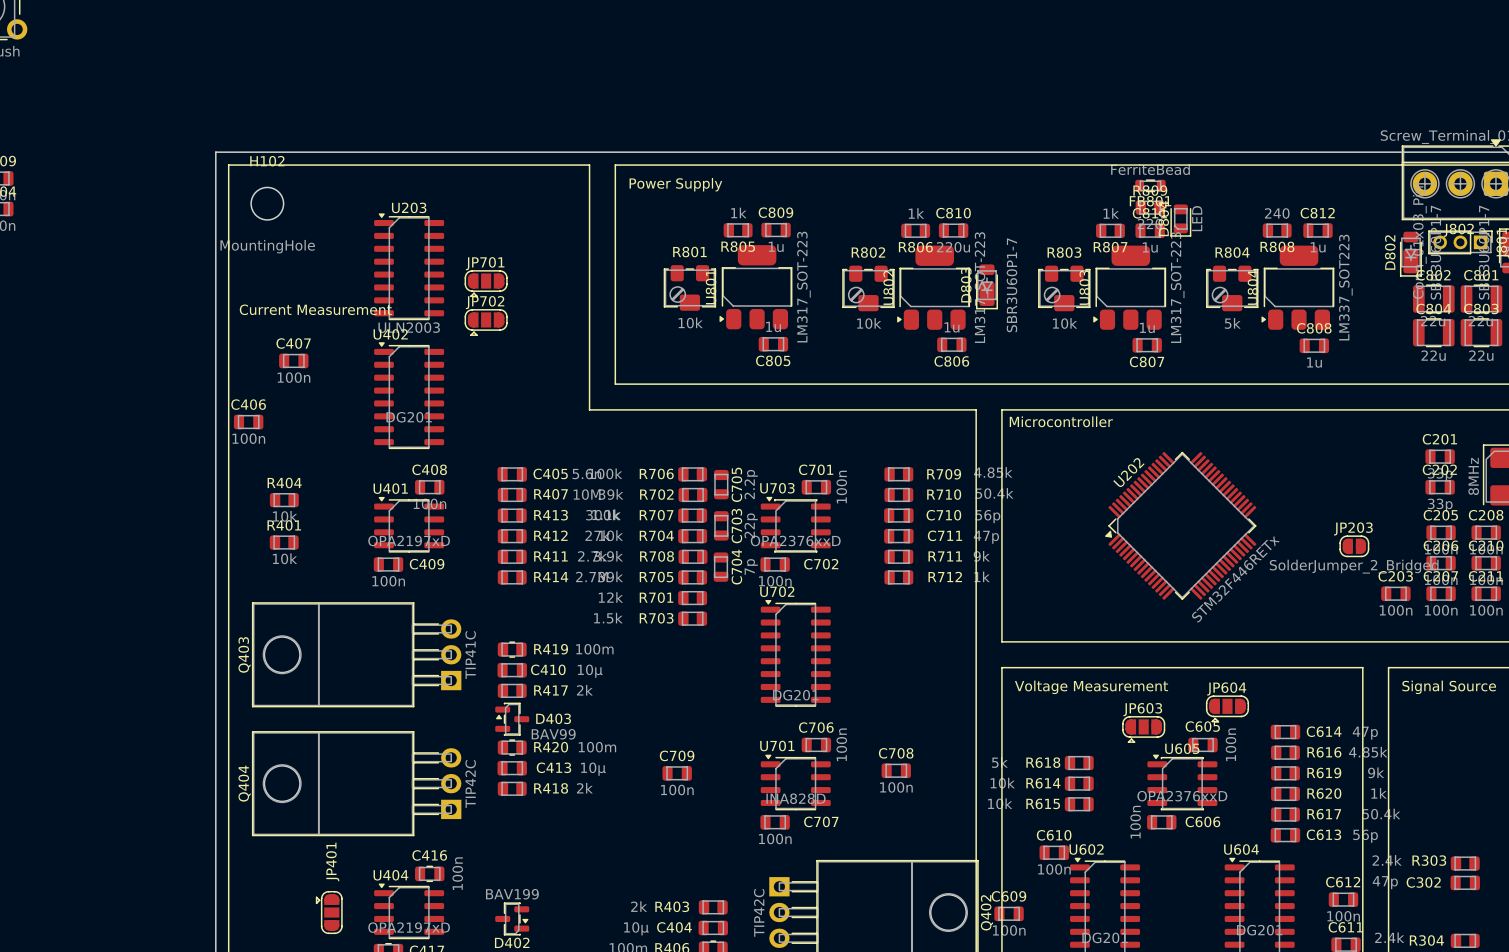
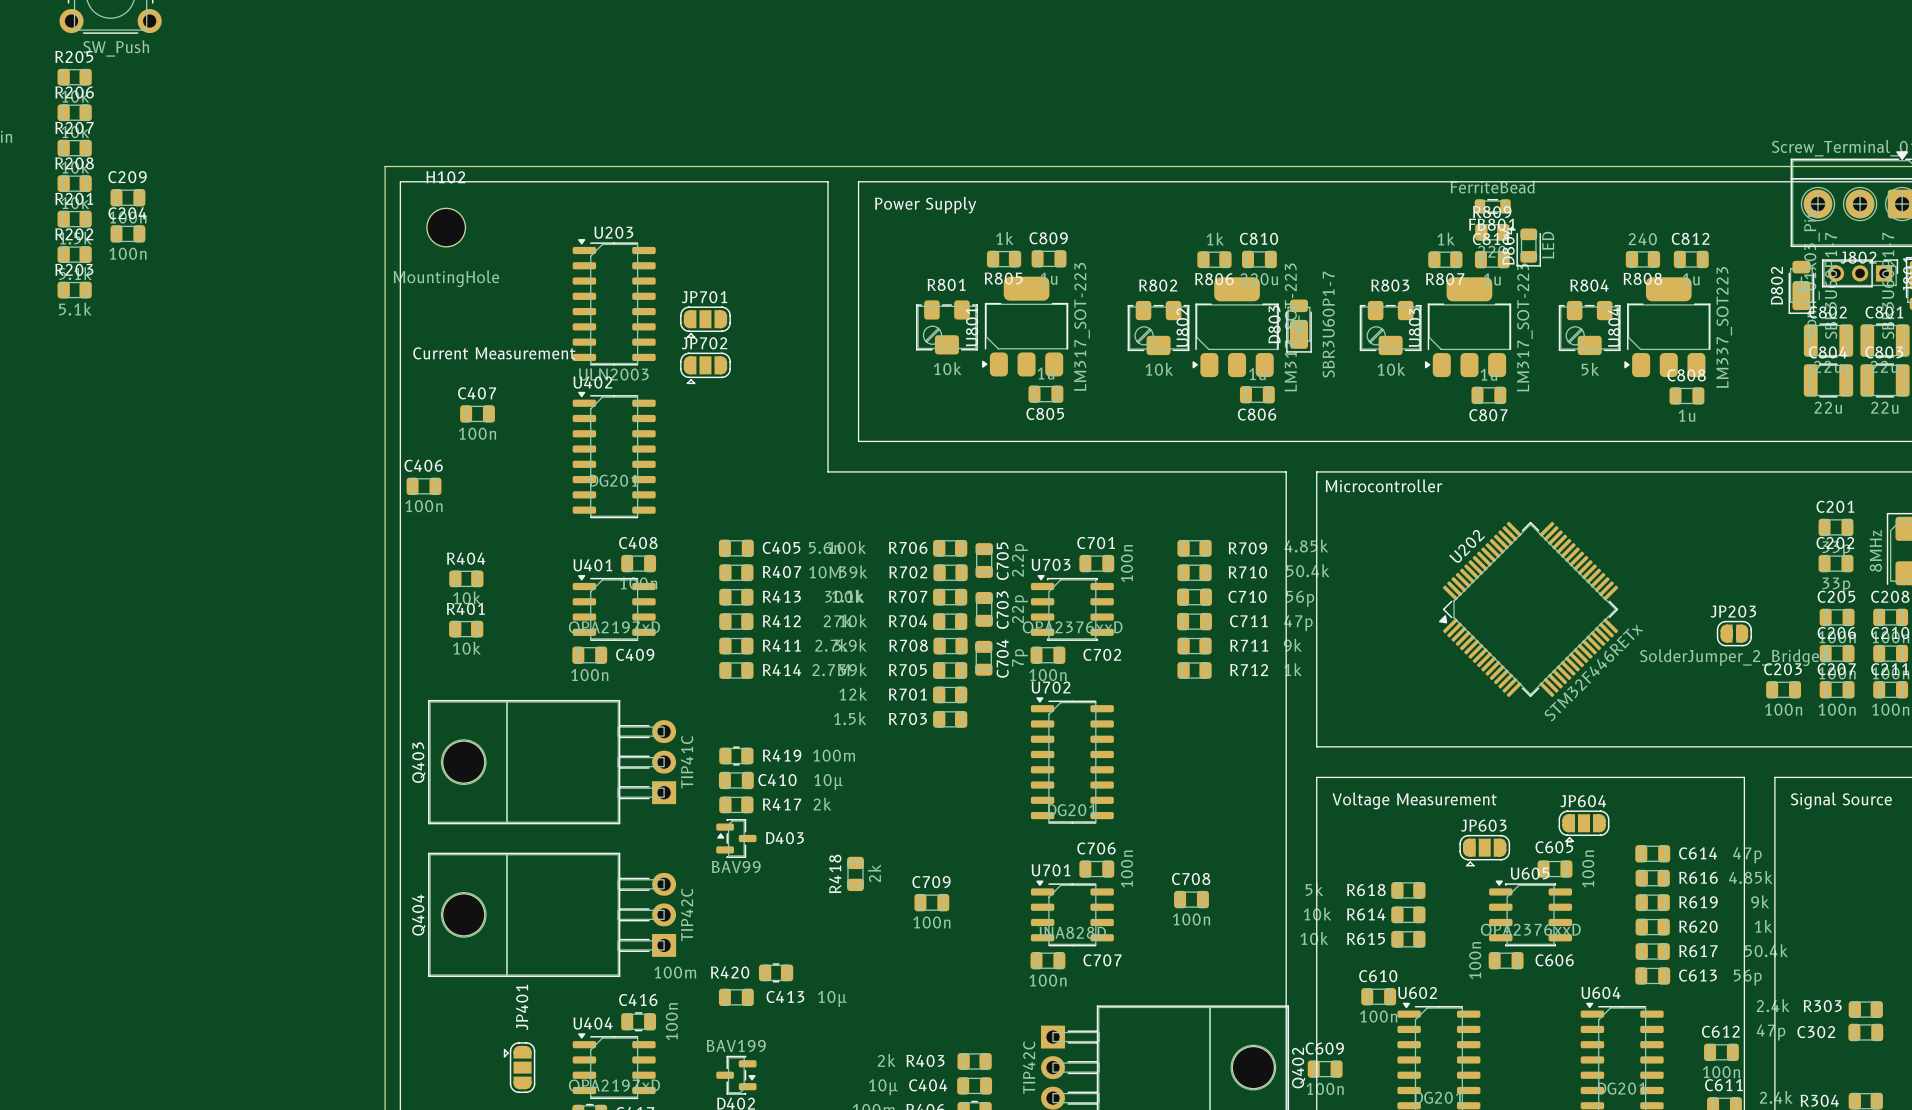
D403 value position: BAV99 (553, 734) -> BAV99 (736, 866)
R420 position: (512, 747) -> (776, 972)
R420 name position: R420 (551, 747) -> R420 (730, 972)
R420 value position: 100m (597, 747) -> 100m (675, 972)
C413 position: (512, 768) -> (736, 997)
R418 rotation: 0° (512, 788) -> 90° clockwise (855, 873)
R418 position: (512, 788) -> (855, 873)
R418 name position: R418 (551, 788) -> R418 (835, 873)
R418 value position: 2k (584, 788) -> 2k (874, 873)

